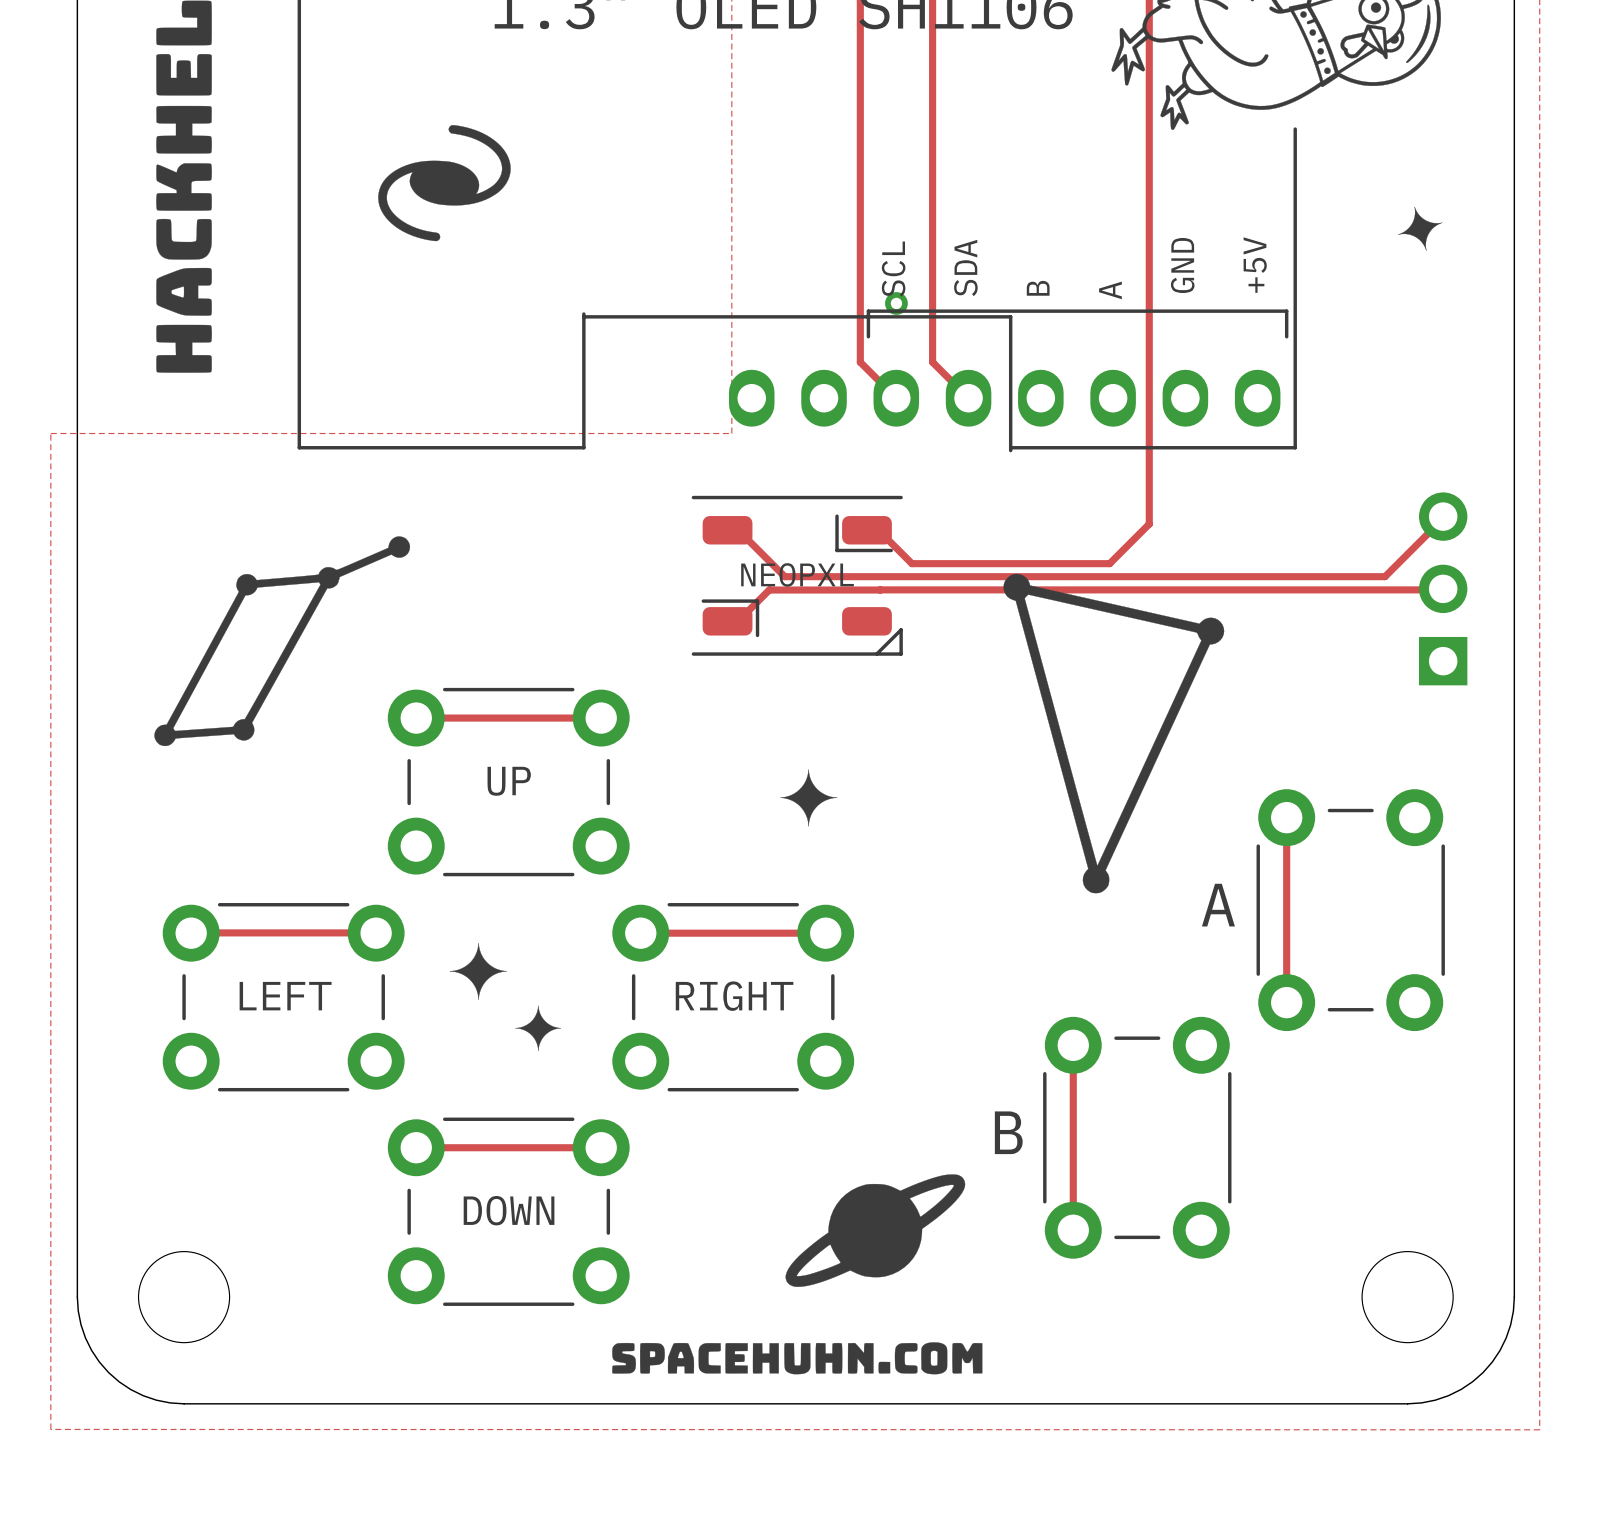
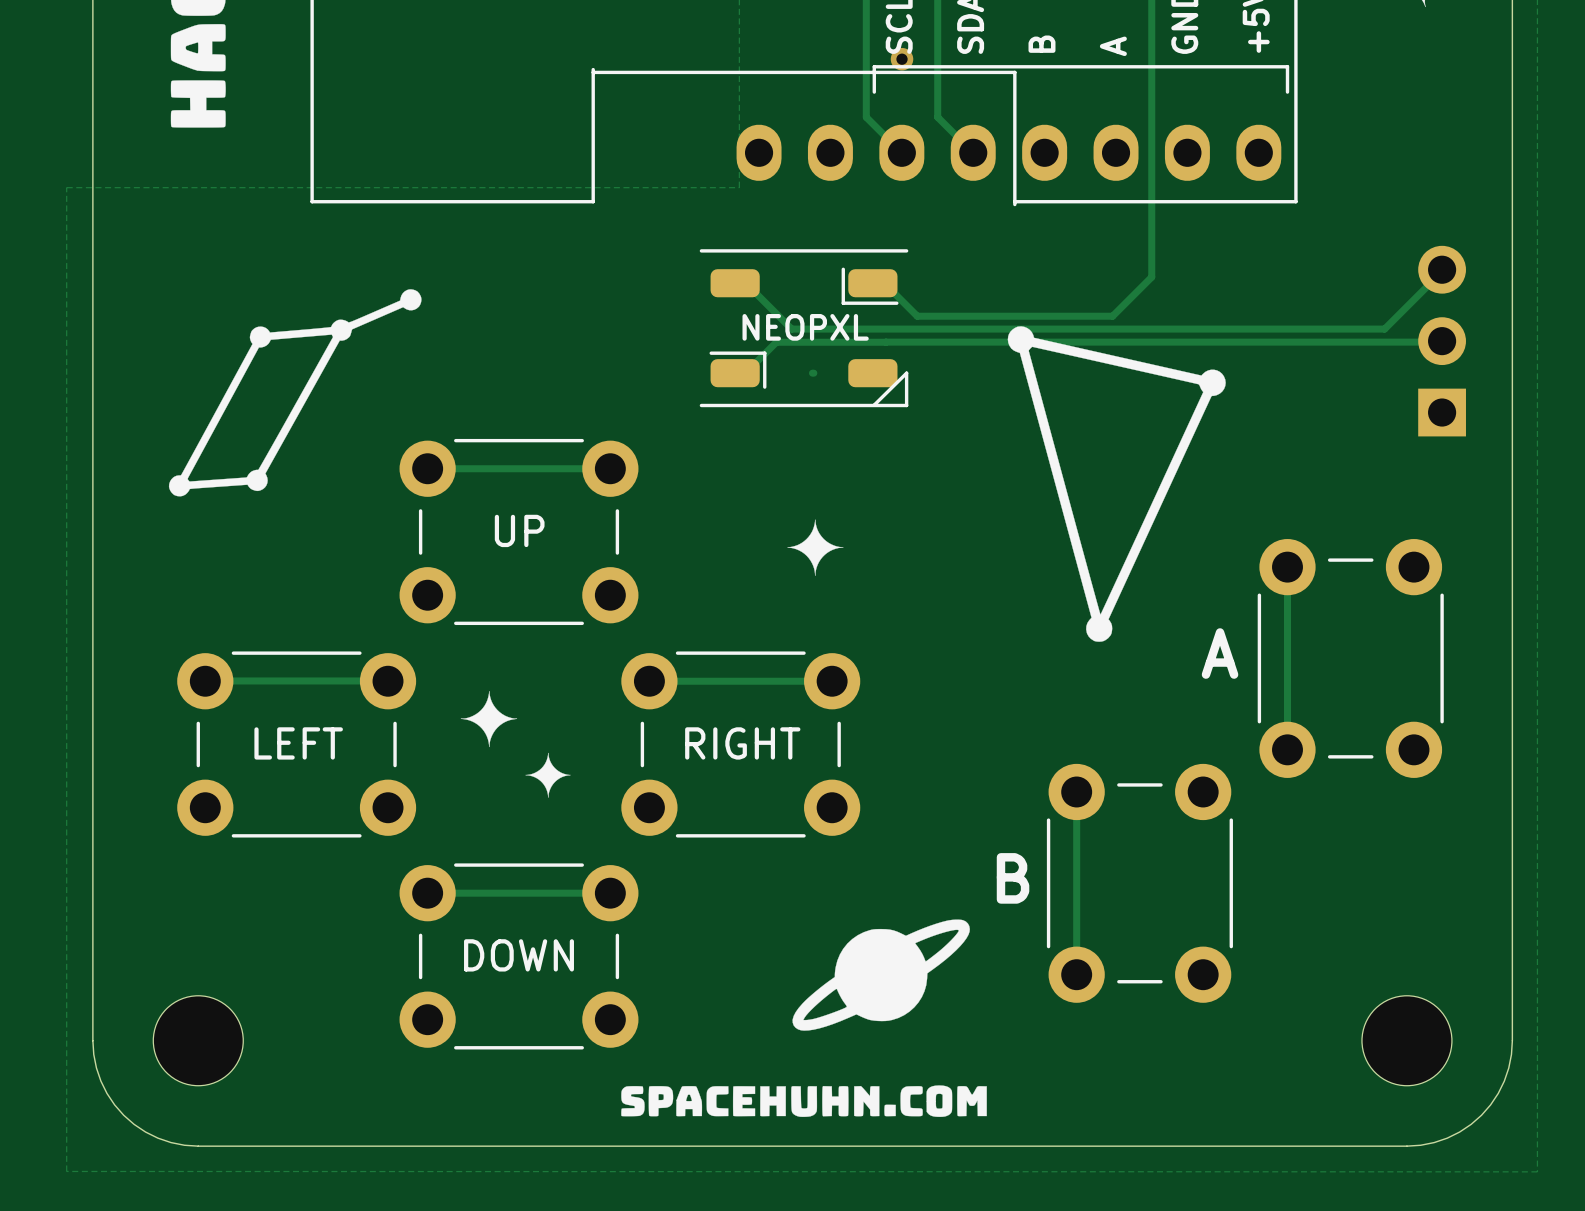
part footprint: [691, 495, 903, 656] -> [699, 249, 909, 408]
track: none -> (812, 373) (813, 373)

